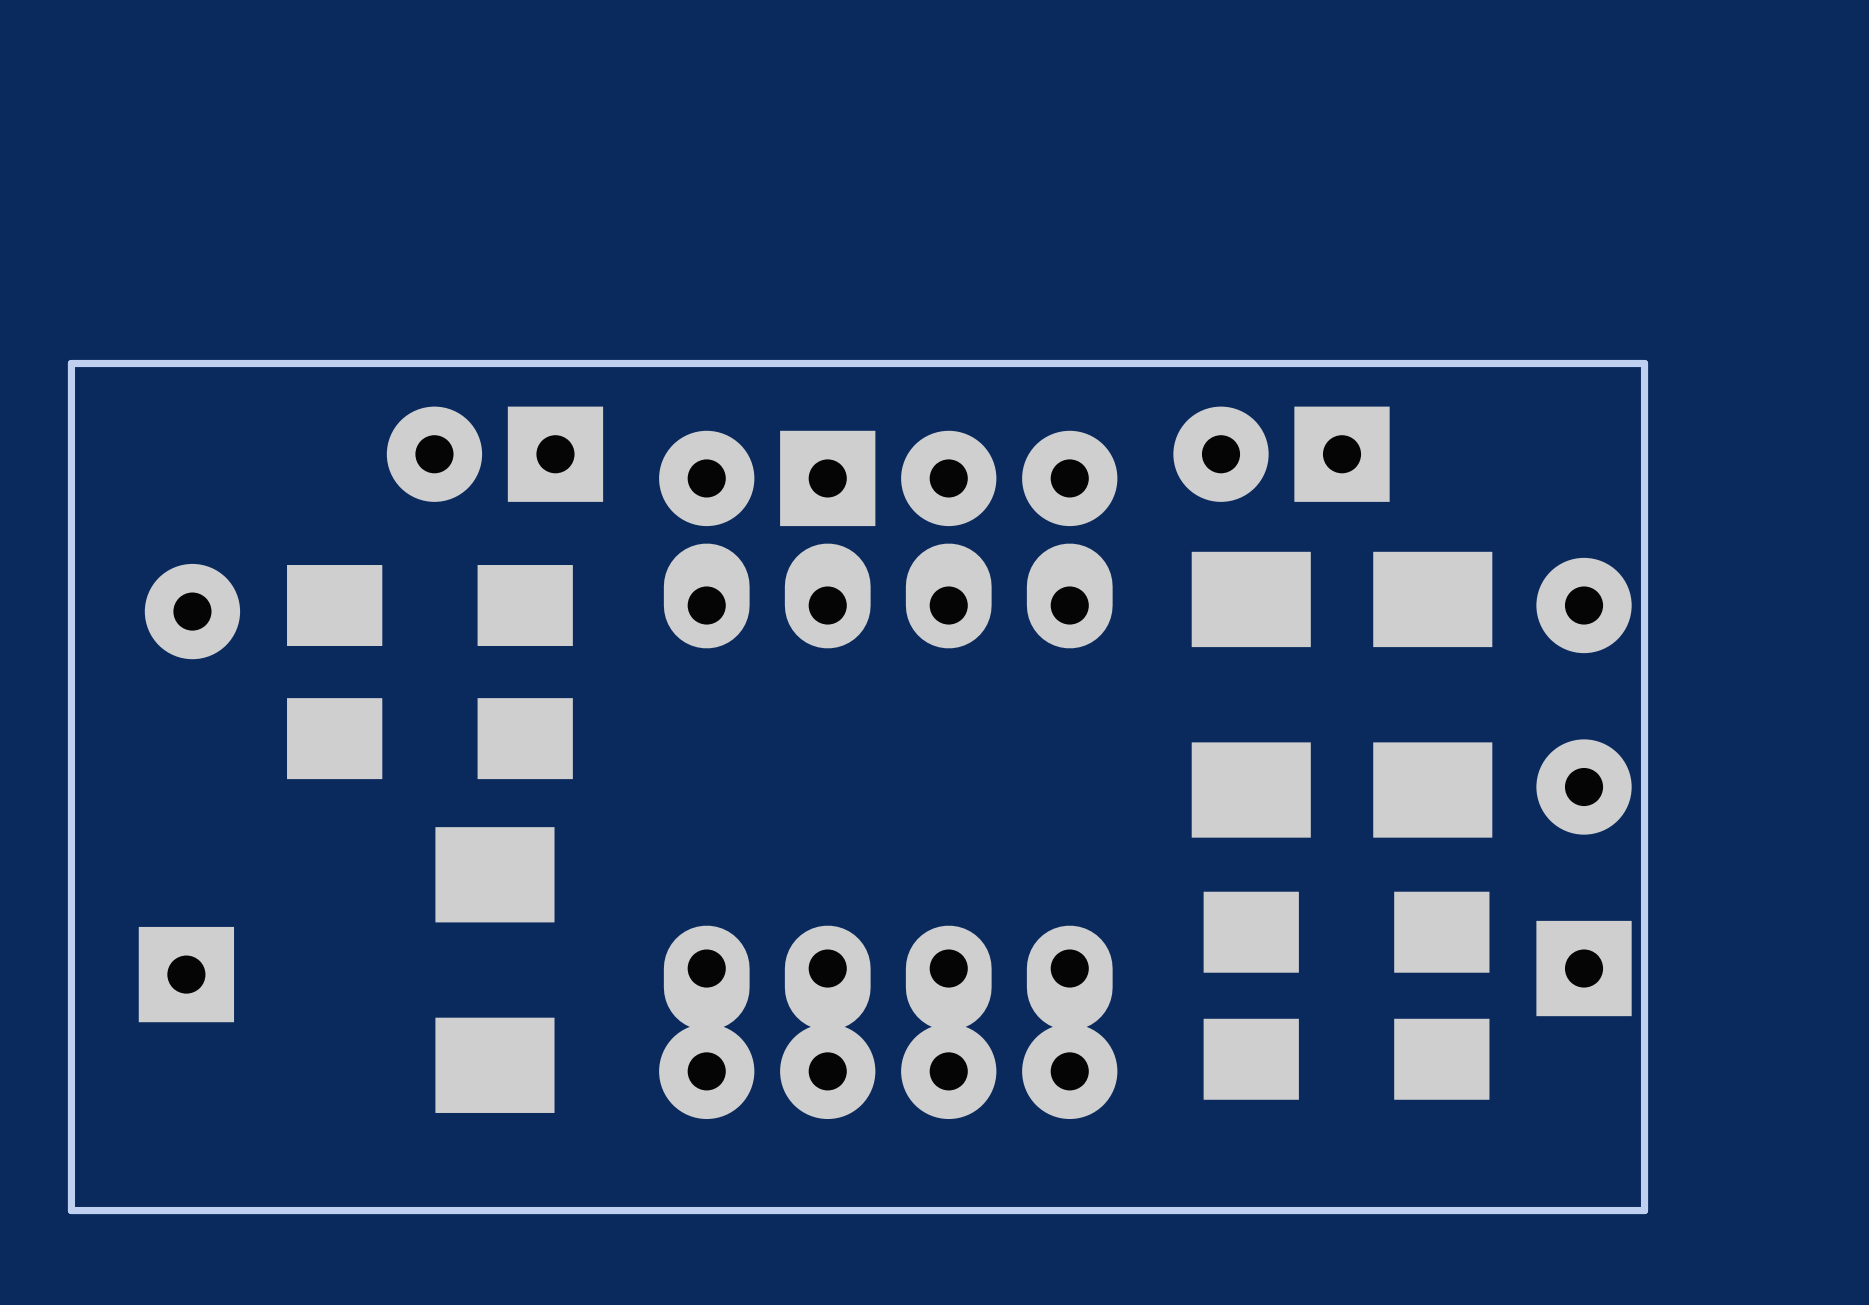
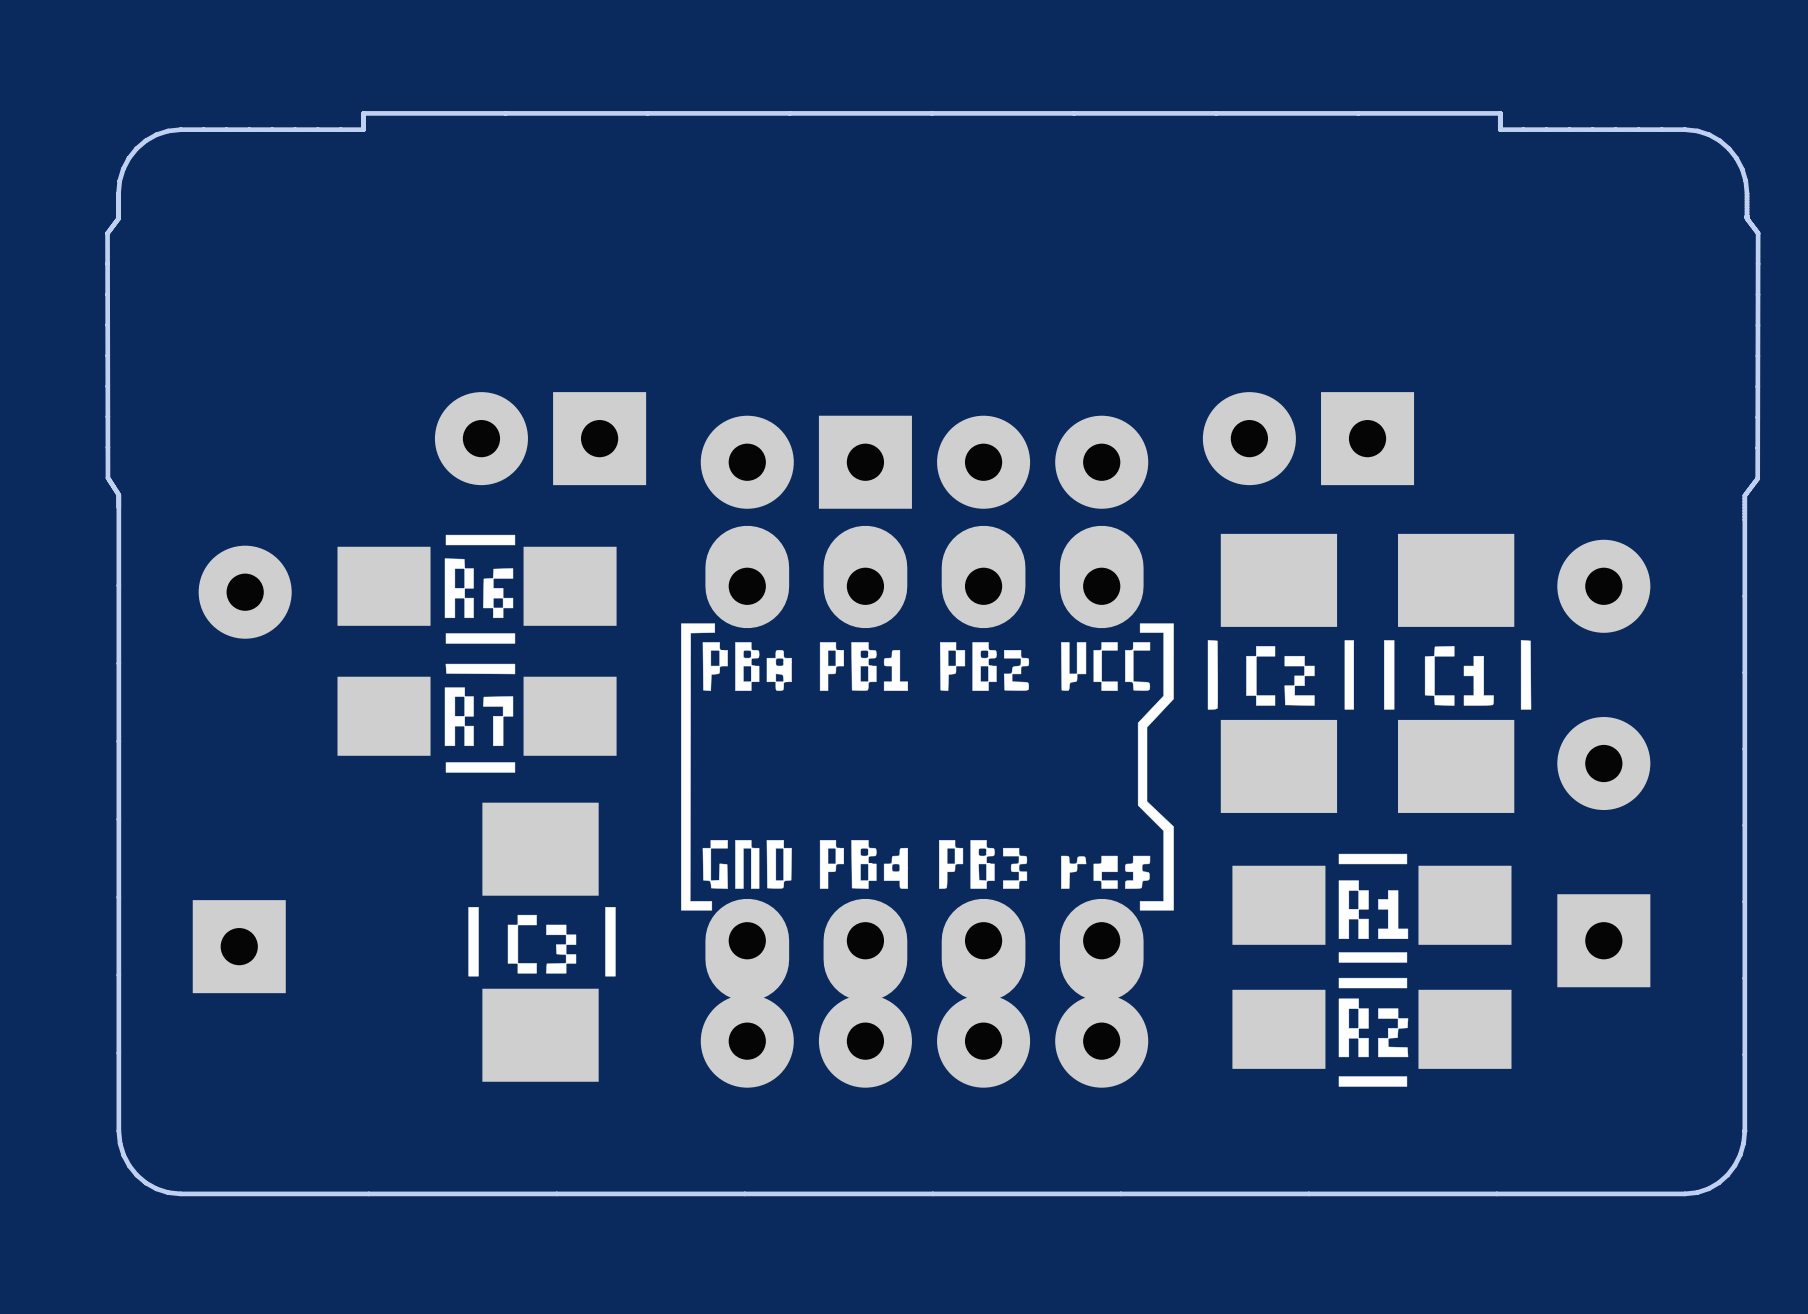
drawing: none -> [105, 111, 1761, 1197]
board edge: (1644, 363) (1644, 1210) (71, 1210) (71, 363) (1644, 363) -> none

